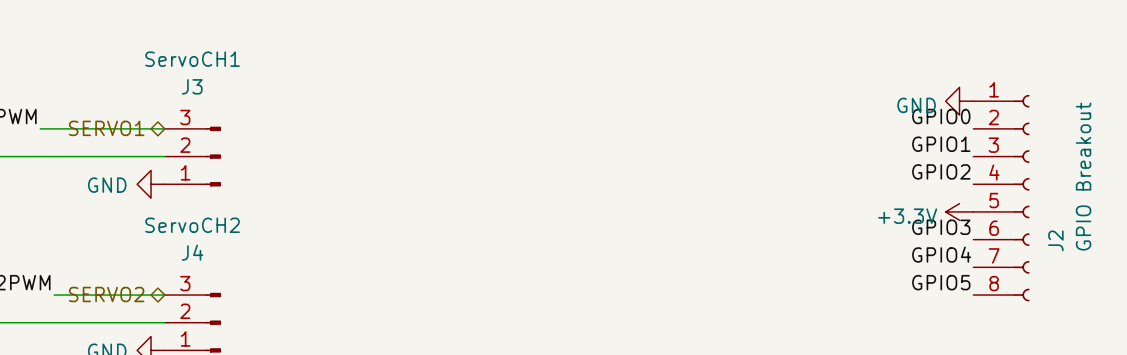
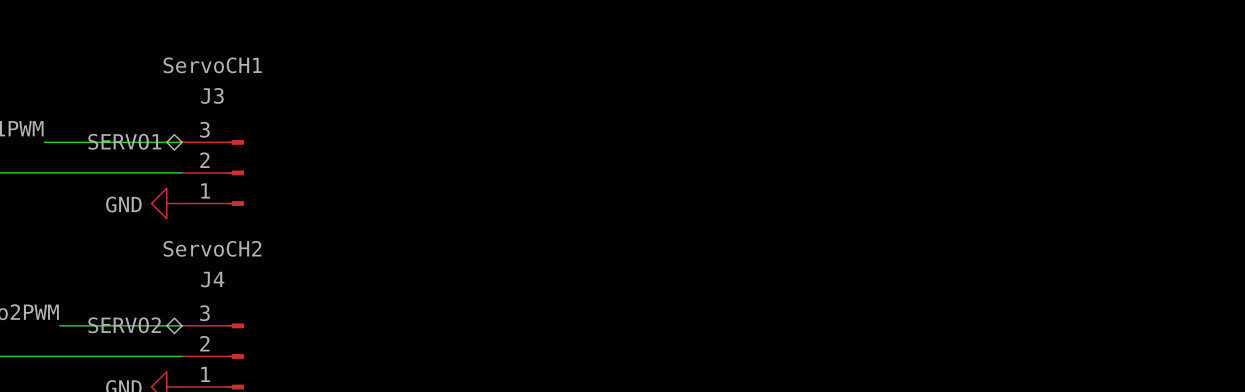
power symbol: GND (959, 101) -> none
label: GPIO0 (941, 116) -> none
label: GPIO1 (941, 144) -> none
label: GPIO2 (941, 171) -> none
J2: GPIO Breakout (1001, 198) -> none
power symbol: +3.3V (959, 211) -> none
label: GPIO3 (941, 227) -> none
label: GPIO4 (941, 254) -> none
label: GPIO5 (941, 282) -> none

